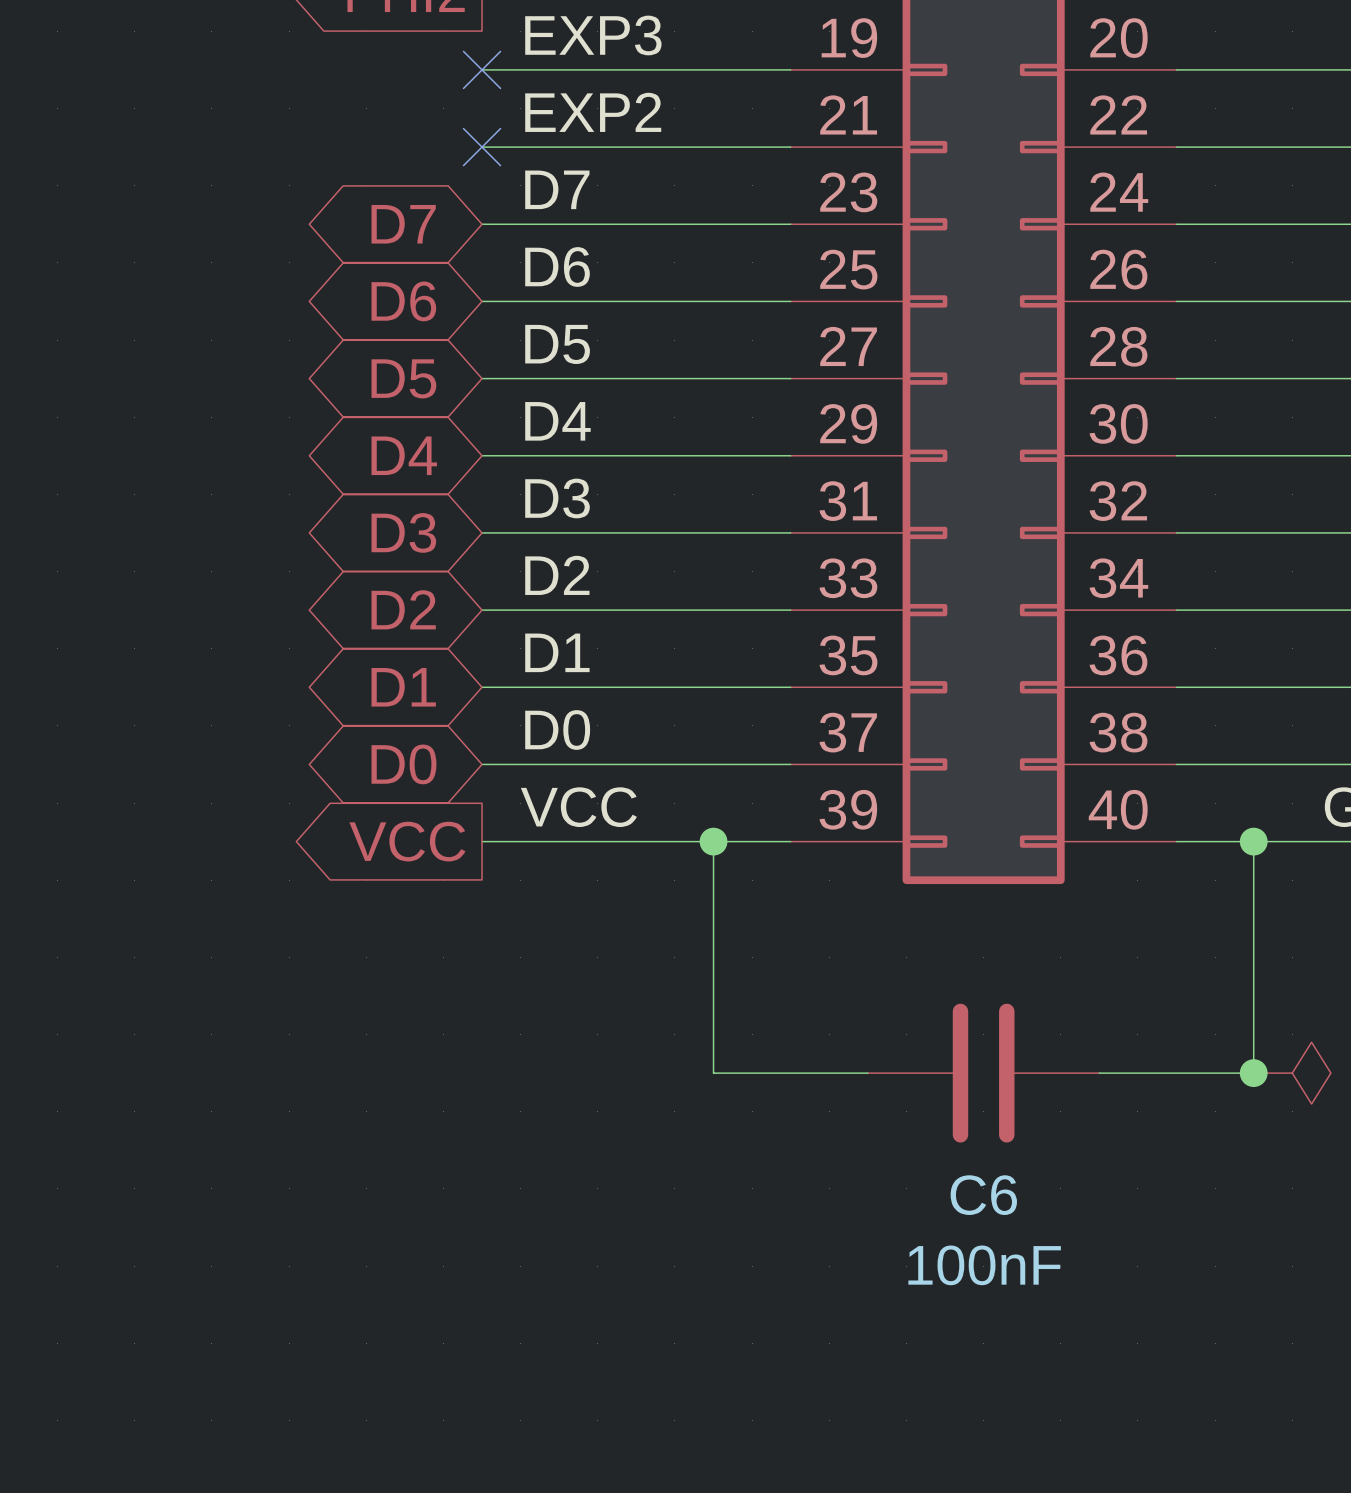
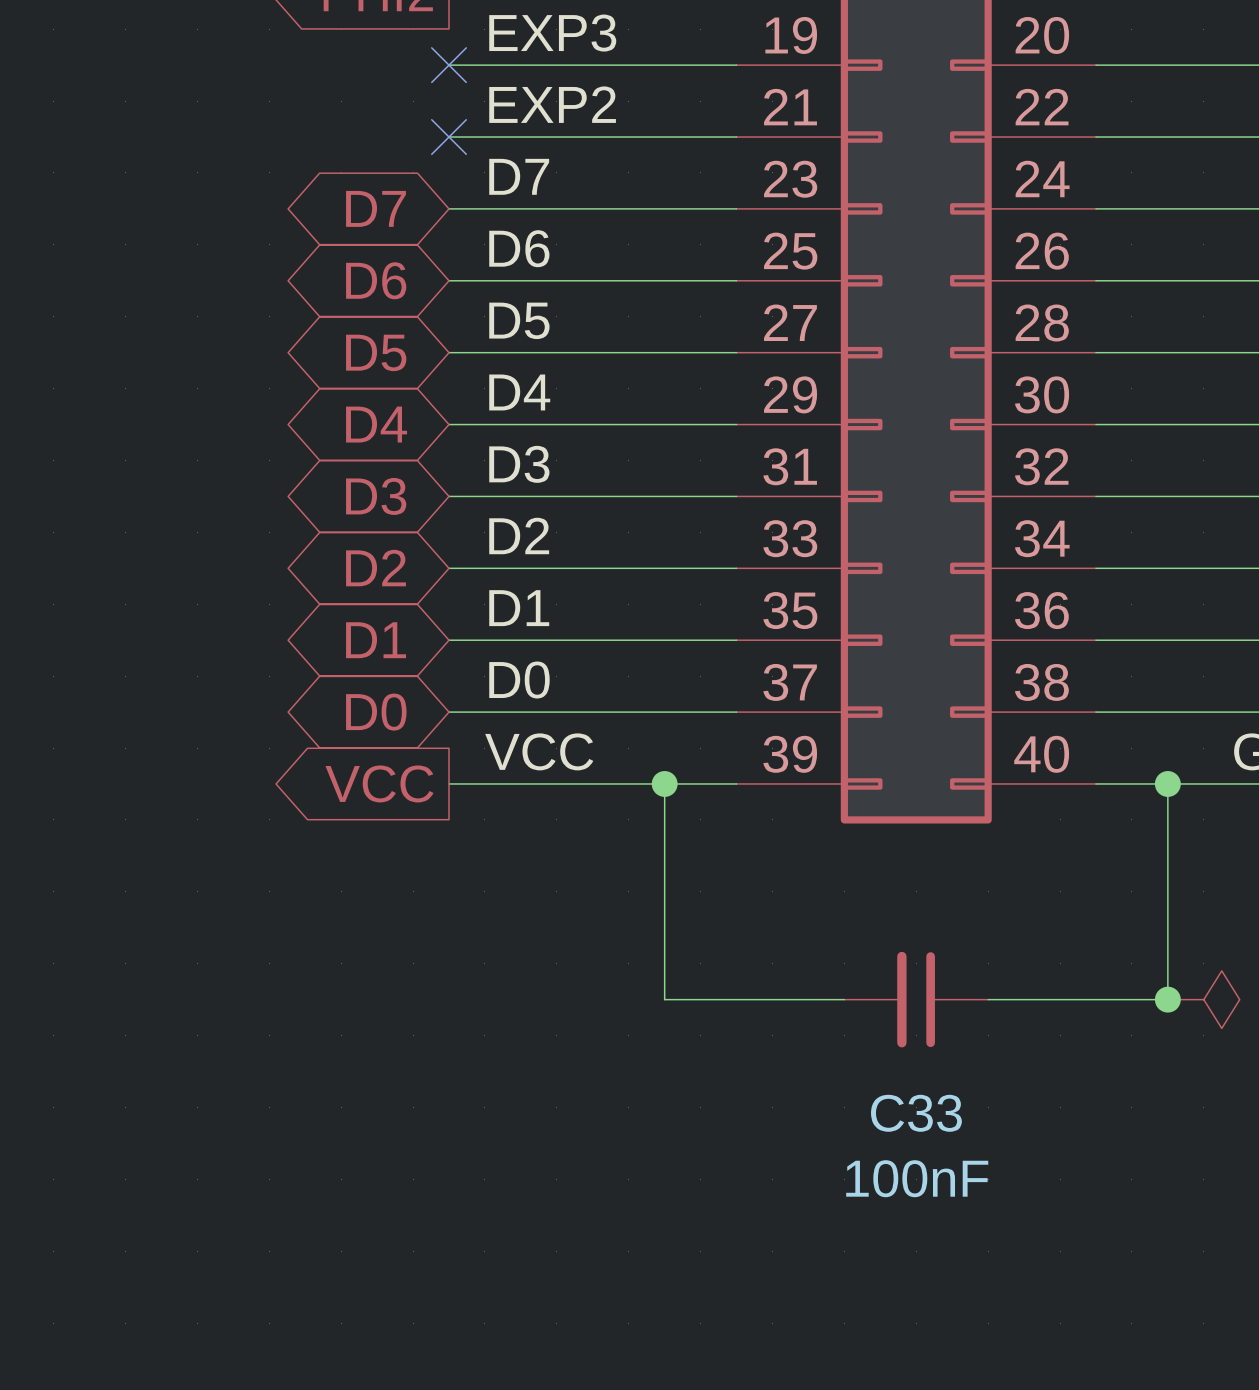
C6: 100nF (983, 1073) -> none
C33: none -> 100nF (916, 999)

